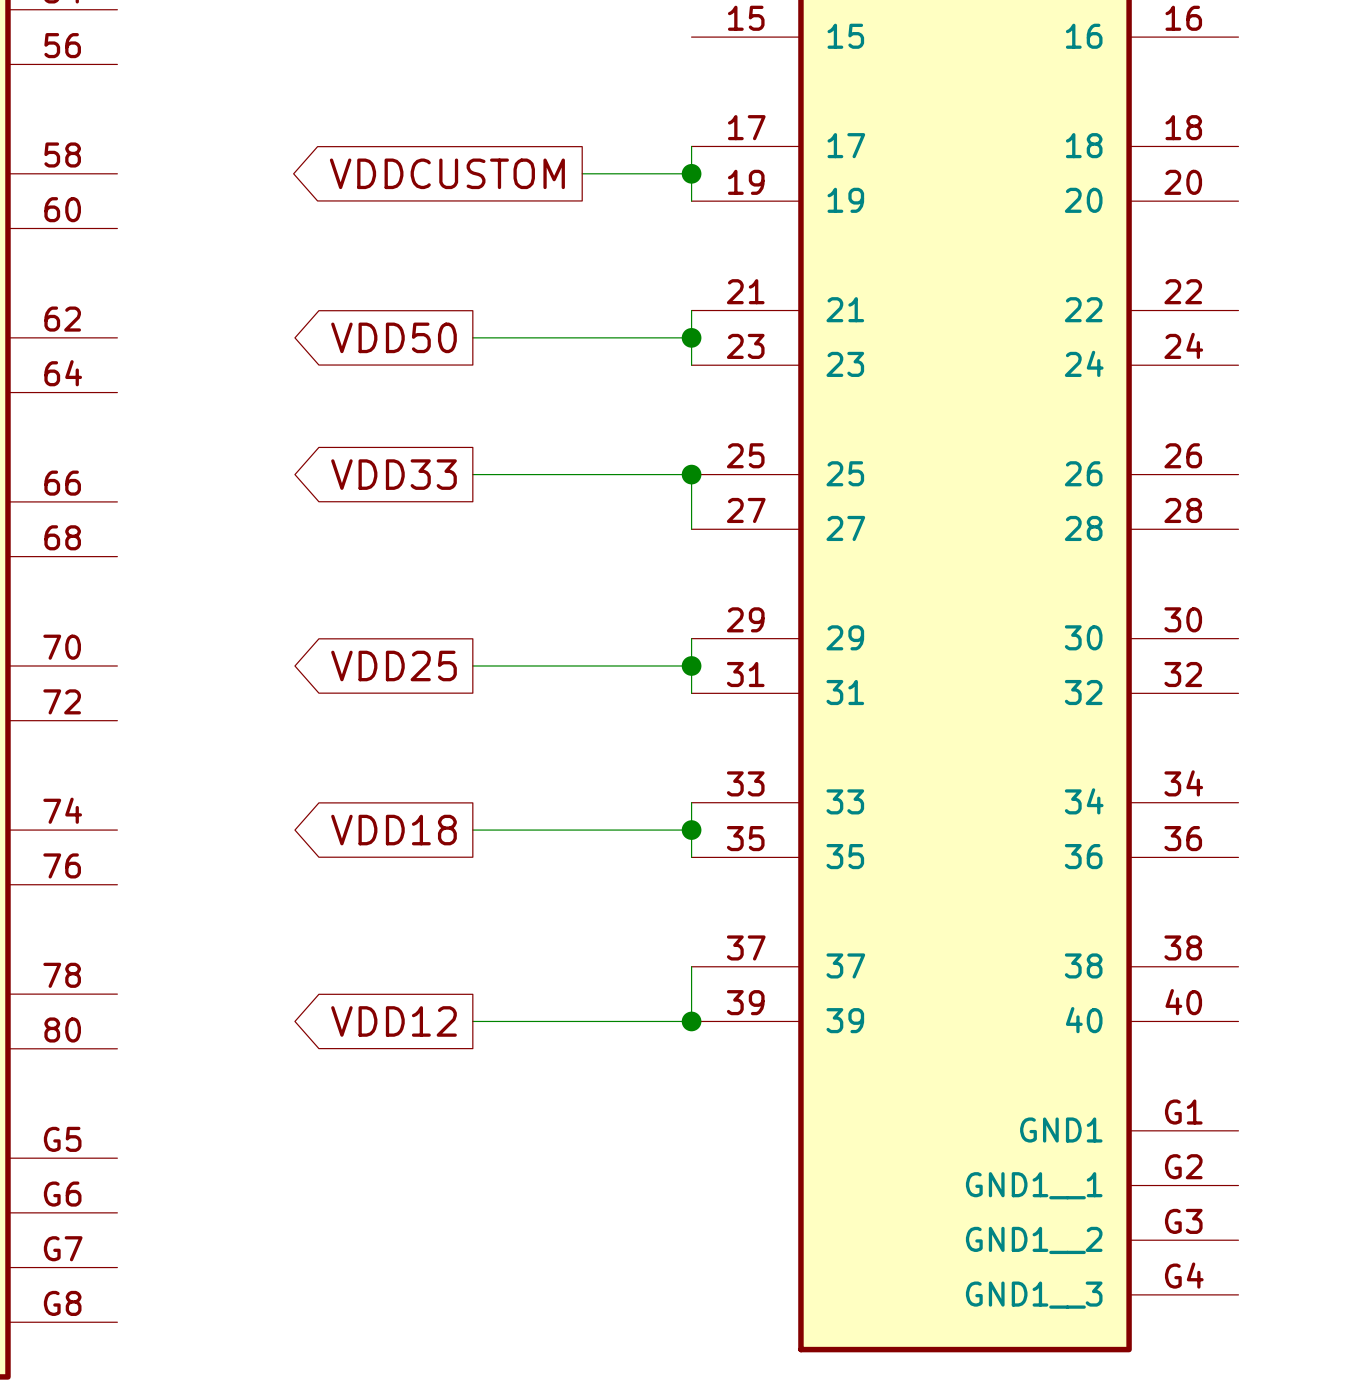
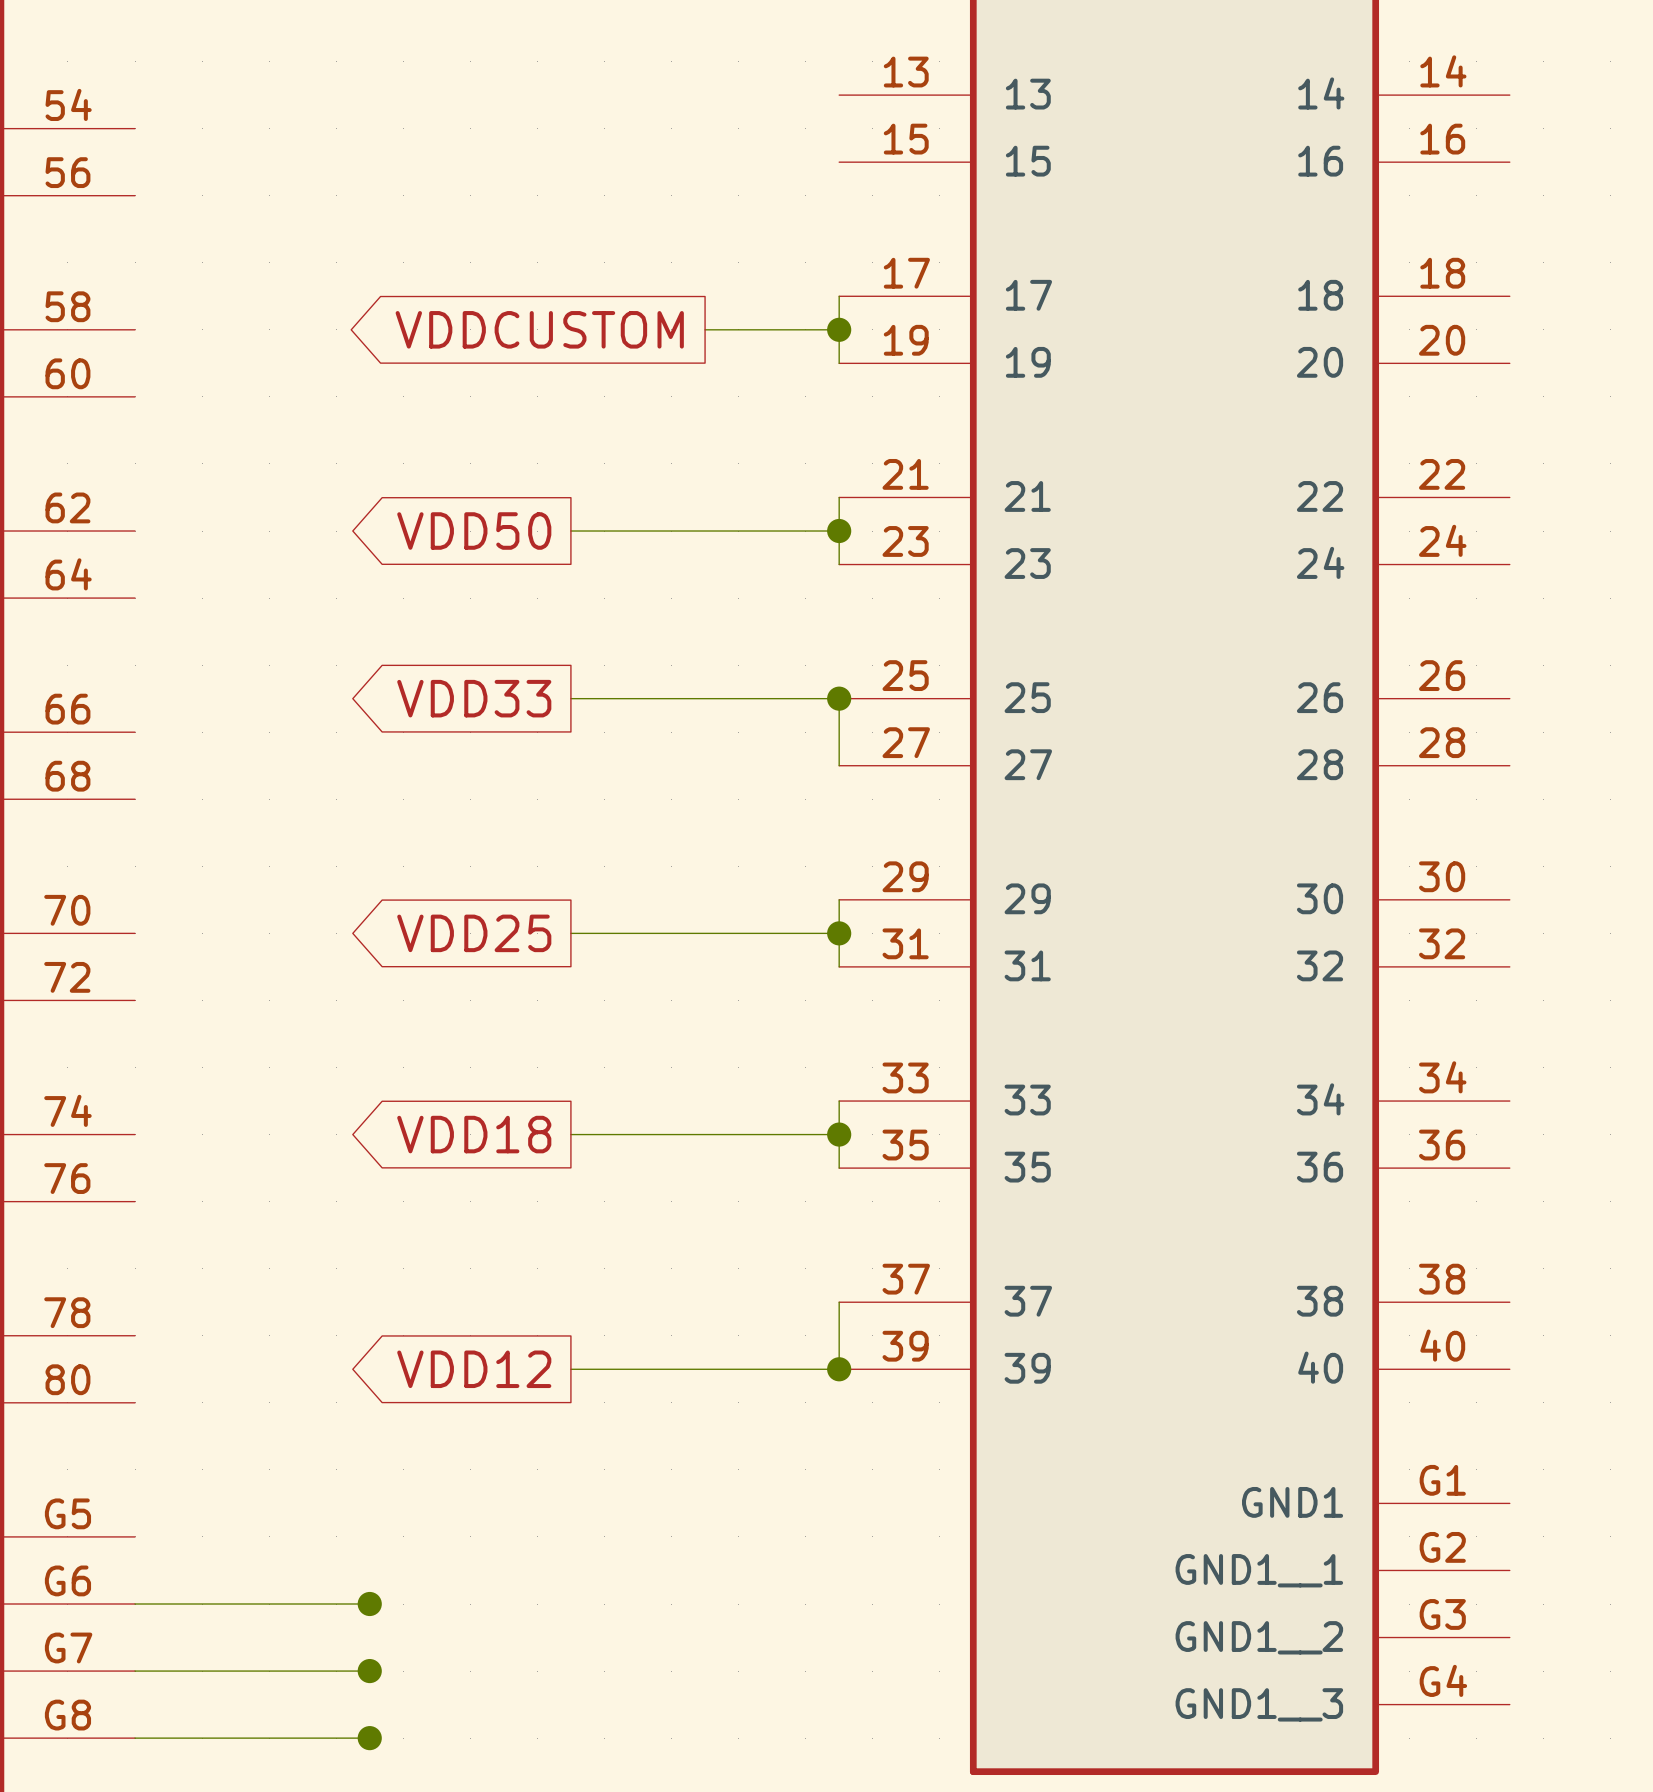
wire: none -> (135, 1604) (369, 1604)
junction: none -> (369, 1604)
wire: none -> (135, 1671) (369, 1671)
junction: none -> (369, 1671)
wire: none -> (135, 1738) (369, 1738)
junction: none -> (369, 1738)

